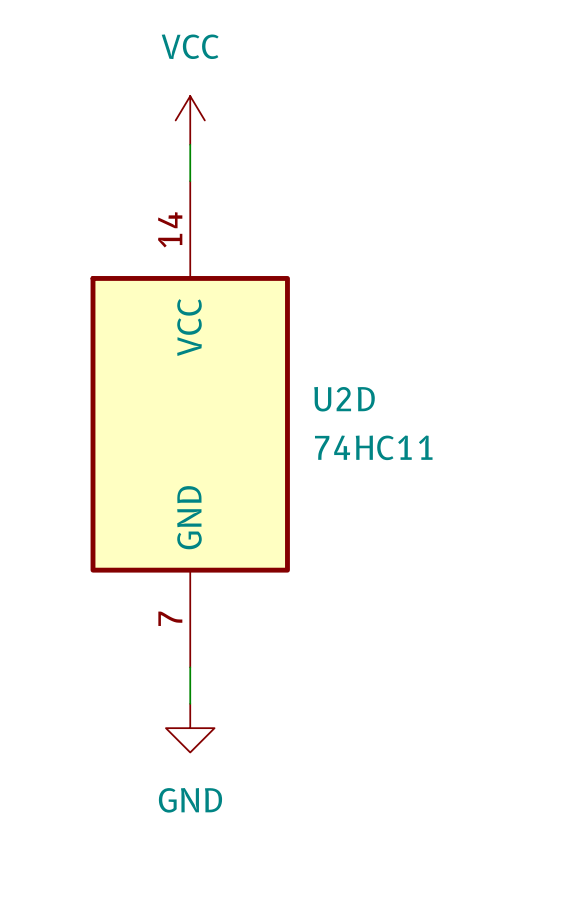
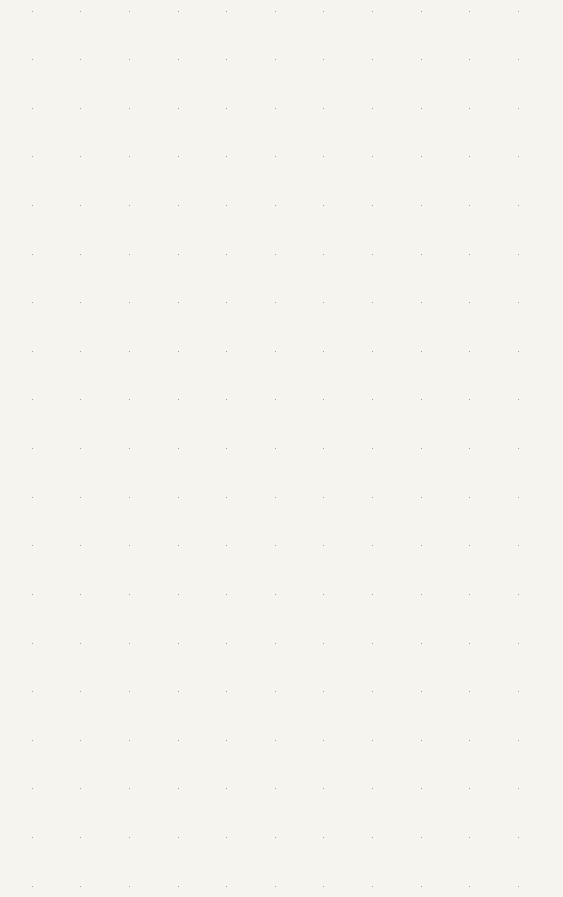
power symbol: VCC (190, 120) -> none
wire: (190, 144) (190, 181) -> none
U2D: 74HC11 (190, 424) -> none
wire: (190, 667) (190, 703) -> none
power symbol: GND (190, 728) -> none

